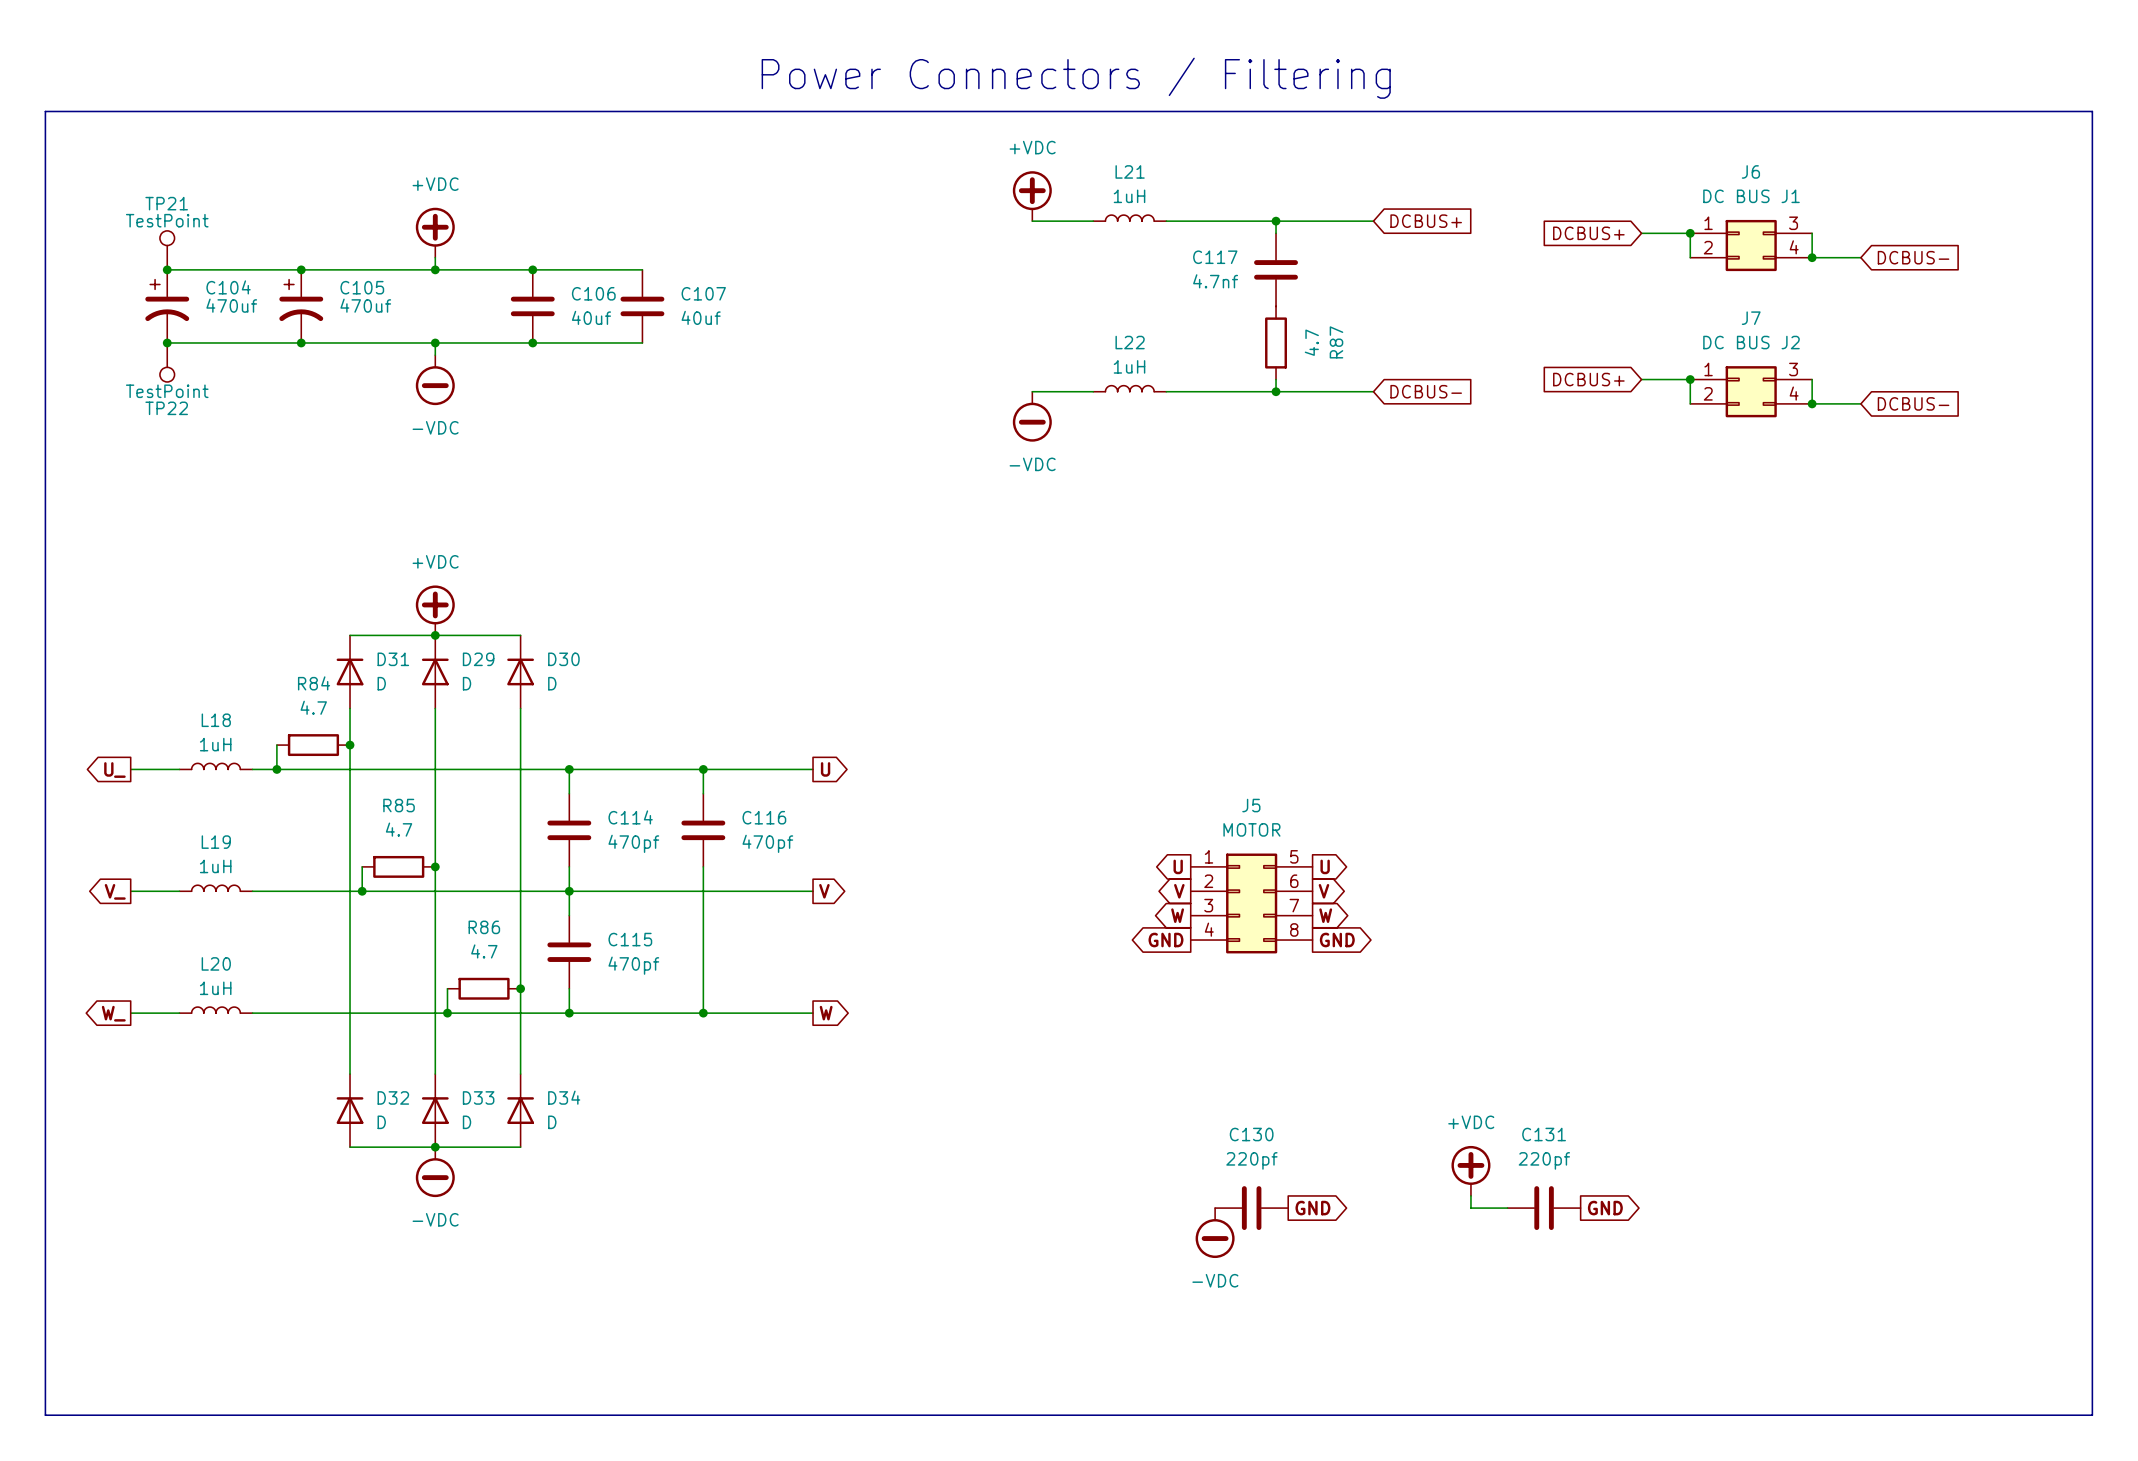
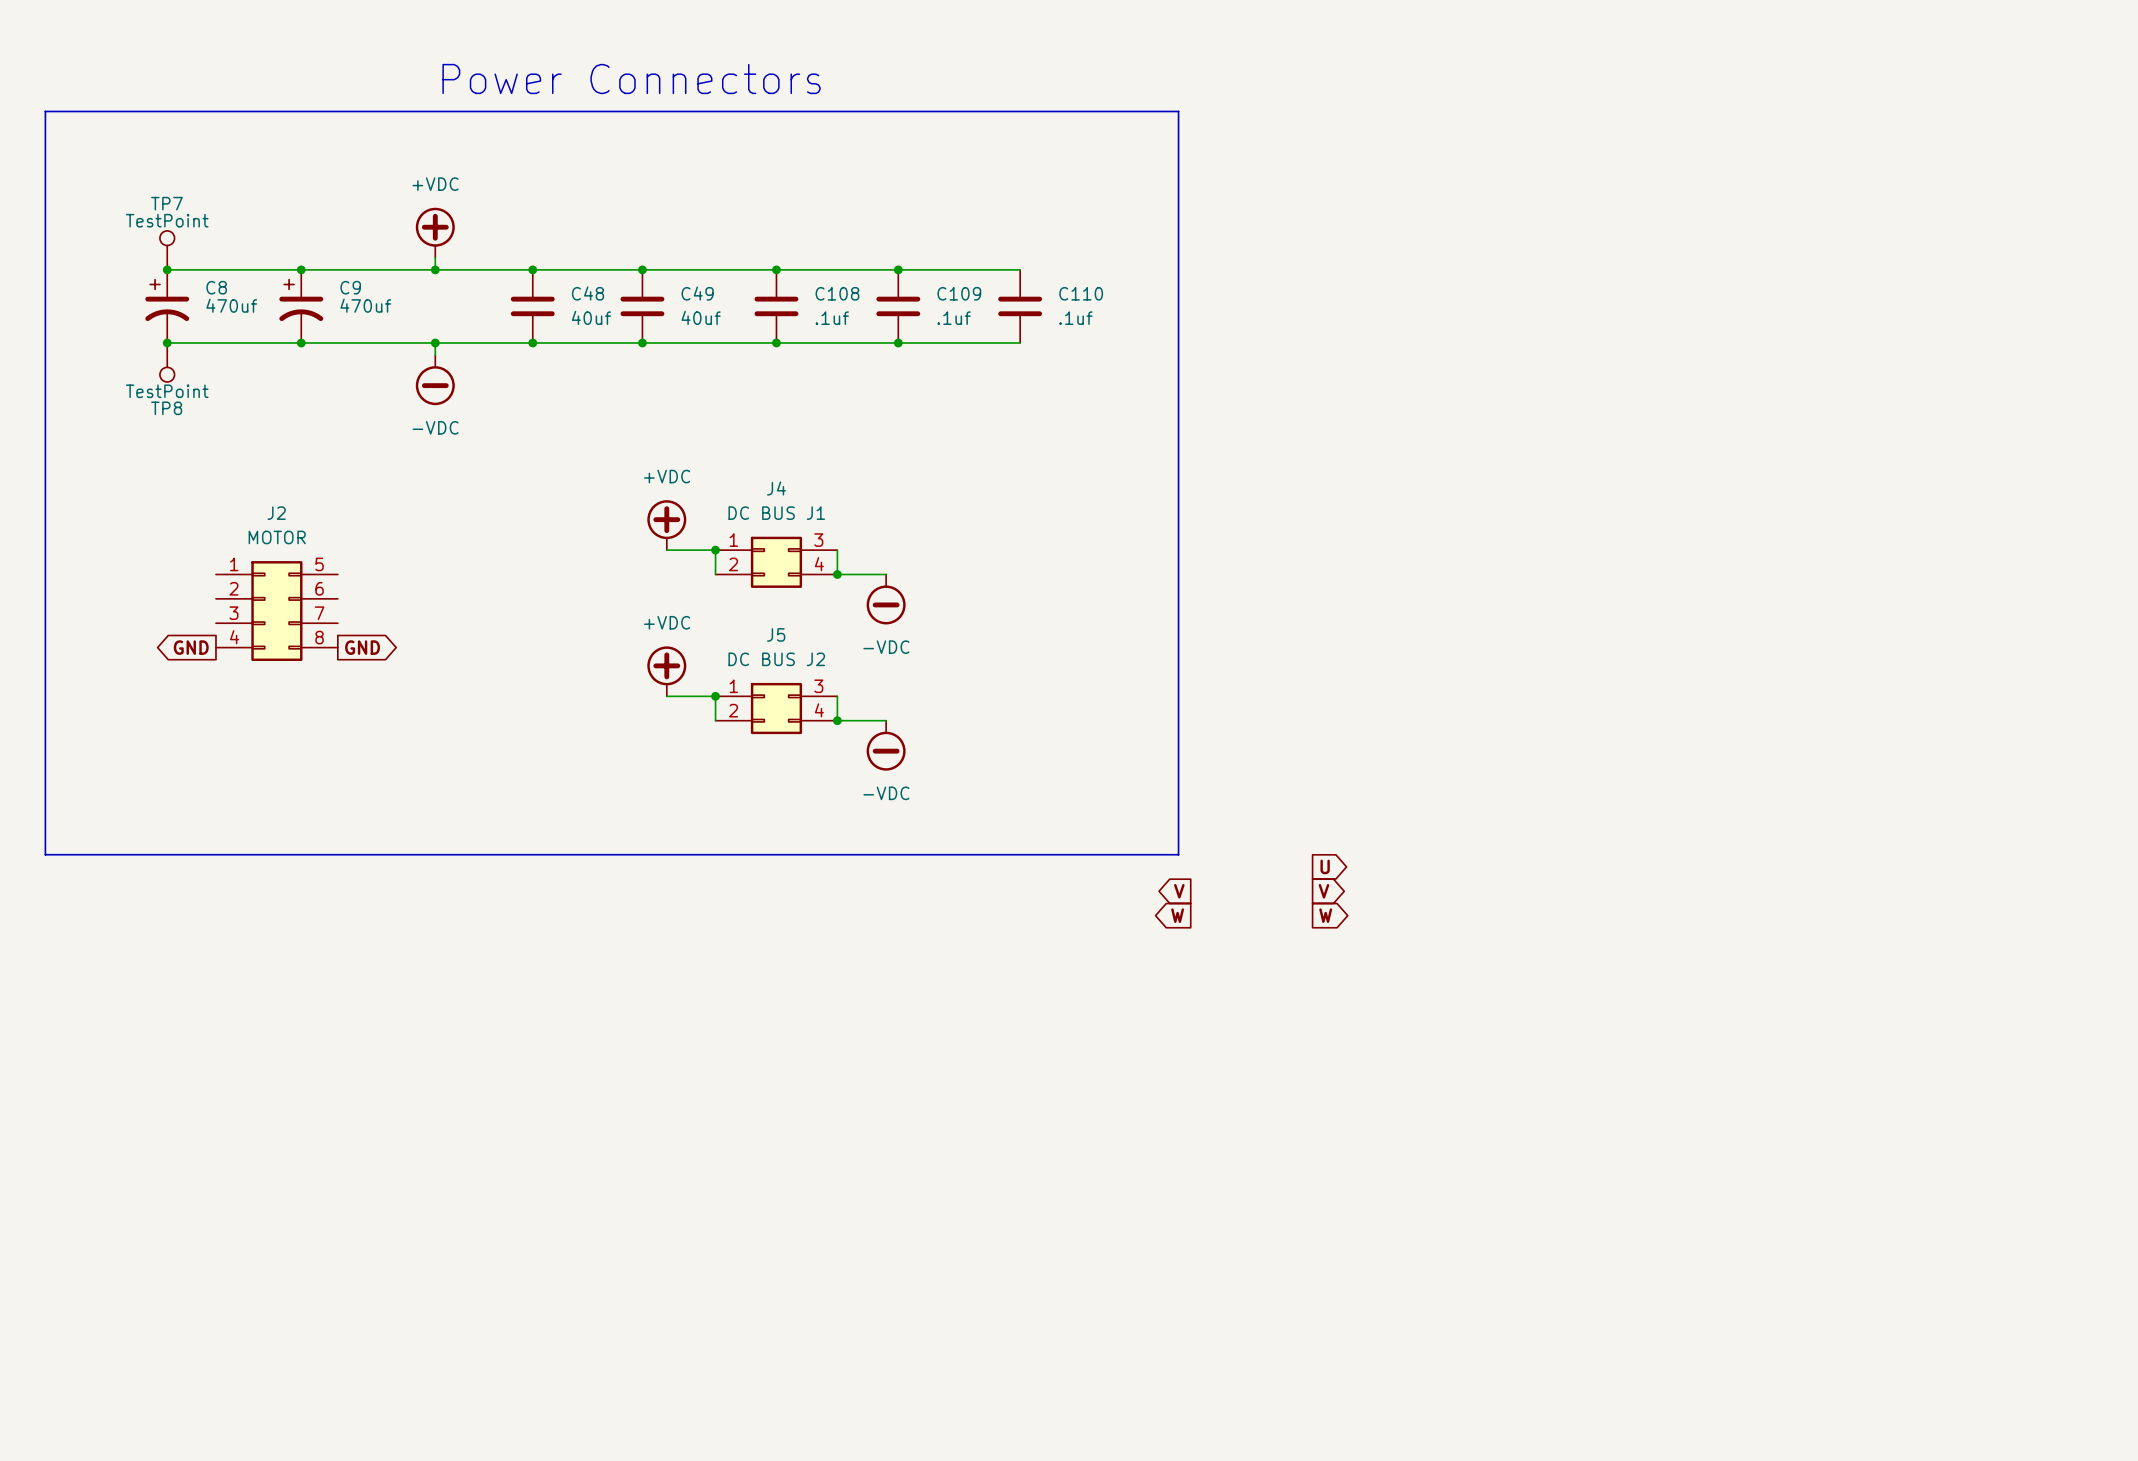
text: none -> Power Connectors (631, 78)
text: Power Connectors / Filtering (1076, 78) -> none
line: (1178, 111) (2092, 111) (2092, 1415) (45, 1415) (45, 854) -> (1178, 111) (1178, 854) (45, 854)
power symbol: +VDC (1032, 196) -> none
TP21 name: TP21 (166, 203) -> TP7 (166, 203)
L21: 1uH (1129, 218) -> none
wire: (1032, 221) (1093, 221) -> none
wire: (1166, 221) (1373, 221) -> none
wire: (1276, 221) (1276, 233) -> none
junction: (1276, 221) -> none
global label: DCBUS+ (1426, 221) -> none
global label: DCBUS+ (1588, 233) -> none
wire: (1641, 233) (1690, 233) (1690, 257) -> none
junction: (1690, 233) -> none
wire: (1812, 233) (1812, 257) (1860, 257) -> none
J6: DC BUS J1 (1751, 245) -> none
junction: (1812, 257) -> none
global label: DCBUS- (1913, 257) -> none
wire: none -> (642, 269) (1020, 269)
junction: none -> (642, 269)
junction: none -> (776, 269)
junction: none -> (898, 269)
C117: 4.7nf (1276, 269) -> none
C104 name: C104 (228, 287) -> C8 (216, 287)
C105 name: C105 (362, 287) -> C9 (350, 287)
C106 name: C106 (593, 293) -> C48 (587, 293)
C107 name: C107 (703, 293) -> C49 (697, 293)
C108: none -> .1uf (776, 306)
C109: none -> .1uf (898, 306)
C110: none -> .1uf (1020, 306)
wire: none -> (642, 342) (1020, 342)
junction: none -> (642, 342)
junction: none -> (776, 342)
junction: none -> (898, 342)
R87: 4.7 (1276, 342) -> none
wire: (1276, 379) (1276, 391) -> none
global label: DCBUS+ (1588, 379) -> none
wire: (1641, 379) (1690, 379) (1690, 403) -> none
junction: (1690, 379) -> none
wire: (1812, 379) (1812, 403) (1860, 403) -> none
L22: 1uH (1129, 388) -> none
wire: (1032, 391) (1093, 391) -> none
wire: (1166, 391) (1373, 391) -> none
junction: (1276, 391) -> none
global label: DCBUS- (1426, 391) -> none
J7: DC BUS J2 (1751, 391) -> none
junction: (1812, 403) -> none
global label: DCBUS- (1913, 403) -> none
TP22 name: TP22 (166, 408) -> TP8 (166, 408)
power symbol: -VDC (1032, 416) -> none
power symbol: none -> +VDC (666, 525)
wire: none -> (666, 550) (715, 550) (715, 574)
junction: none -> (715, 550)
wire: none -> (837, 550) (837, 574) (886, 574)
J4: none -> DC BUS J1 (776, 562)
junction: none -> (837, 574)
power symbol: none -> -VDC (886, 599)
power symbol: +VDC (435, 610) -> none
J2: none -> MOTOR (276, 611)
wire: (350, 635) (520, 635) -> none
junction: (435, 635) -> none
global label: none -> GND (191, 647)
global label: none -> GND (362, 647)
D31: D (350, 671) -> none
D29: D (435, 671) -> none
D30: D (520, 671) -> none
power symbol: none -> +VDC (666, 671)
wire: none -> (666, 696) (715, 696) (715, 720)
junction: none -> (715, 696)
wire: none -> (837, 696) (837, 720) (886, 720)
wire: (350, 708) (350, 1074) -> none
wire: (435, 708) (435, 1074) -> none
wire: (520, 708) (520, 1074) -> none
junction: none -> (837, 720)
wire: (276, 745) (276, 769) -> none
R84: 4.7 (313, 745) -> none
junction: (350, 745) -> none
power symbol: none -> -VDC (886, 745)
L18: 1uH (215, 766) -> none
wire: (130, 769) (179, 769) -> none
wire: (252, 769) (813, 769) -> none
junction: (276, 769) -> none
wire: (569, 769) (569, 793) -> none
junction: (569, 769) -> none
wire: (703, 769) (703, 793) -> none
junction: (703, 769) -> none
global label: U (825, 769) -> none
global label: U_ (114, 770) -> none
J5 name position: J5 (1251, 805) -> J5 (776, 634)
J5 value: MOTOR (1251, 829) -> DC BUS J2 (776, 659)
C114: 470pf (569, 830) -> none
C116: 470pf (703, 830) -> none
J5 symbol: [1190, 853, 1313, 954] -> [715, 682, 838, 735]
wire: (362, 866) (362, 891) -> none
R85: 4.7 (398, 866) -> none
junction: (435, 866) -> none
wire: (569, 866) (569, 915) -> none
wire: (703, 866) (703, 1013) -> none
global label: U (1178, 866) -> none
L19: 1uH (215, 888) -> none
global label: V_ (115, 891) -> none
wire: (130, 891) (179, 891) -> none
wire: (252, 891) (813, 891) -> none
junction: (362, 891) -> none
junction: (569, 891) -> none
global label: V (824, 891) -> none
global label: GND (1165, 940) -> none
global label: GND (1337, 940) -> none
C115: 470pf (569, 952) -> none
wire: (447, 988) (447, 1013) -> none
R86: 4.7 (484, 988) -> none
junction: (520, 988) -> none
wire: (569, 988) (569, 1013) -> none
L20: 1uH (215, 1010) -> none
global label: W_ (113, 1013) -> none
wire: (130, 1013) (179, 1013) -> none
wire: (252, 1013) (813, 1013) -> none
junction: (447, 1013) -> none
junction: (569, 1013) -> none
junction: (703, 1013) -> none
global label: W (826, 1013) -> none
D32: D (350, 1110) -> none
D33: D (435, 1110) -> none
D34: D (520, 1110) -> none
wire: (350, 1147) (520, 1147) -> none
junction: (435, 1147) -> none
power symbol: +VDC (1470, 1170) -> none
power symbol: -VDC (435, 1172) -> none
wire: (1470, 1195) (1470, 1208) (1507, 1208) -> none
C130: 220pf (1251, 1208) -> none
global label: GND (1312, 1208) -> none
C131: 220pf (1544, 1208) -> none
global label: GND (1605, 1208) -> none
power symbol: -VDC (1215, 1233) -> none

